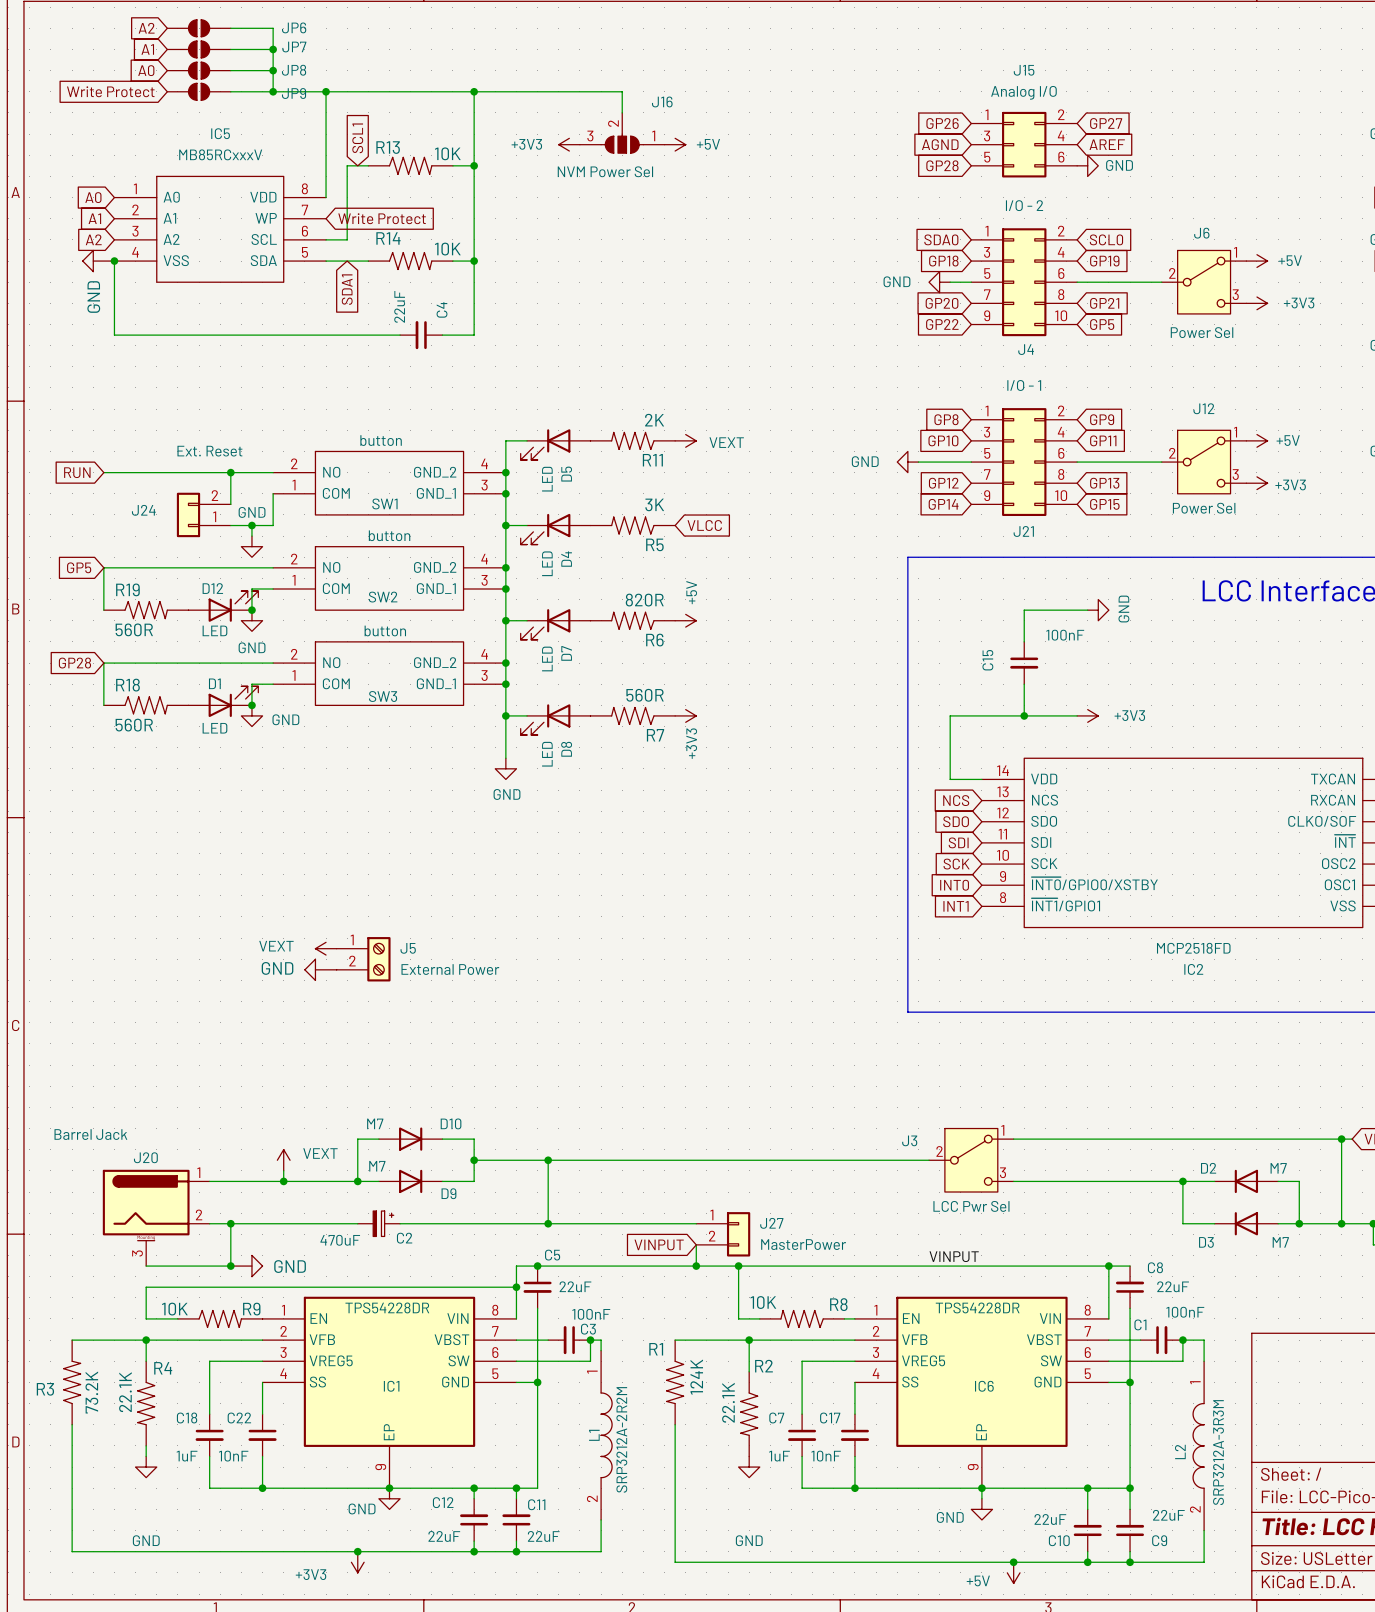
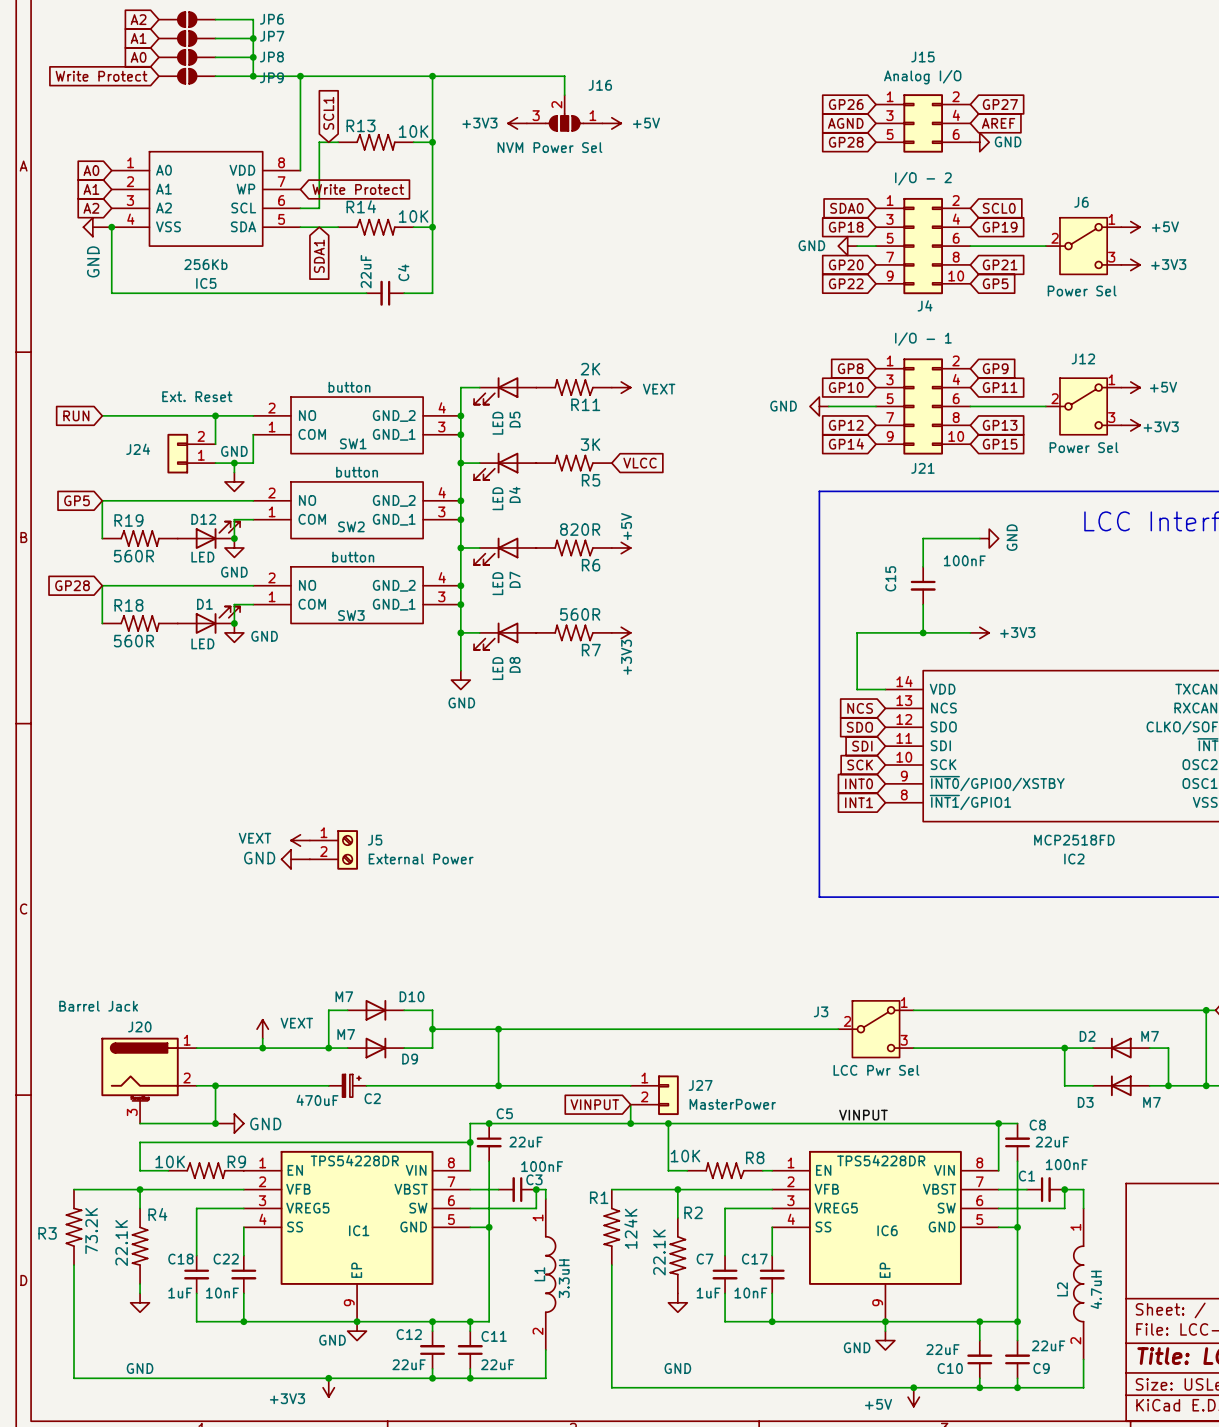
IC5 name position: IC5 (220, 133) -> IC5 (206, 283)
IC5 value: MB85RCxxxV (220, 154) -> 256Kb (205, 264)
L1 value: SRP3212A-2R2M (621, 1439) -> 3.3uH (564, 1278)
L2 value: SRP3212A-3R3M (1218, 1452) -> 4.7uH (1096, 1289)

